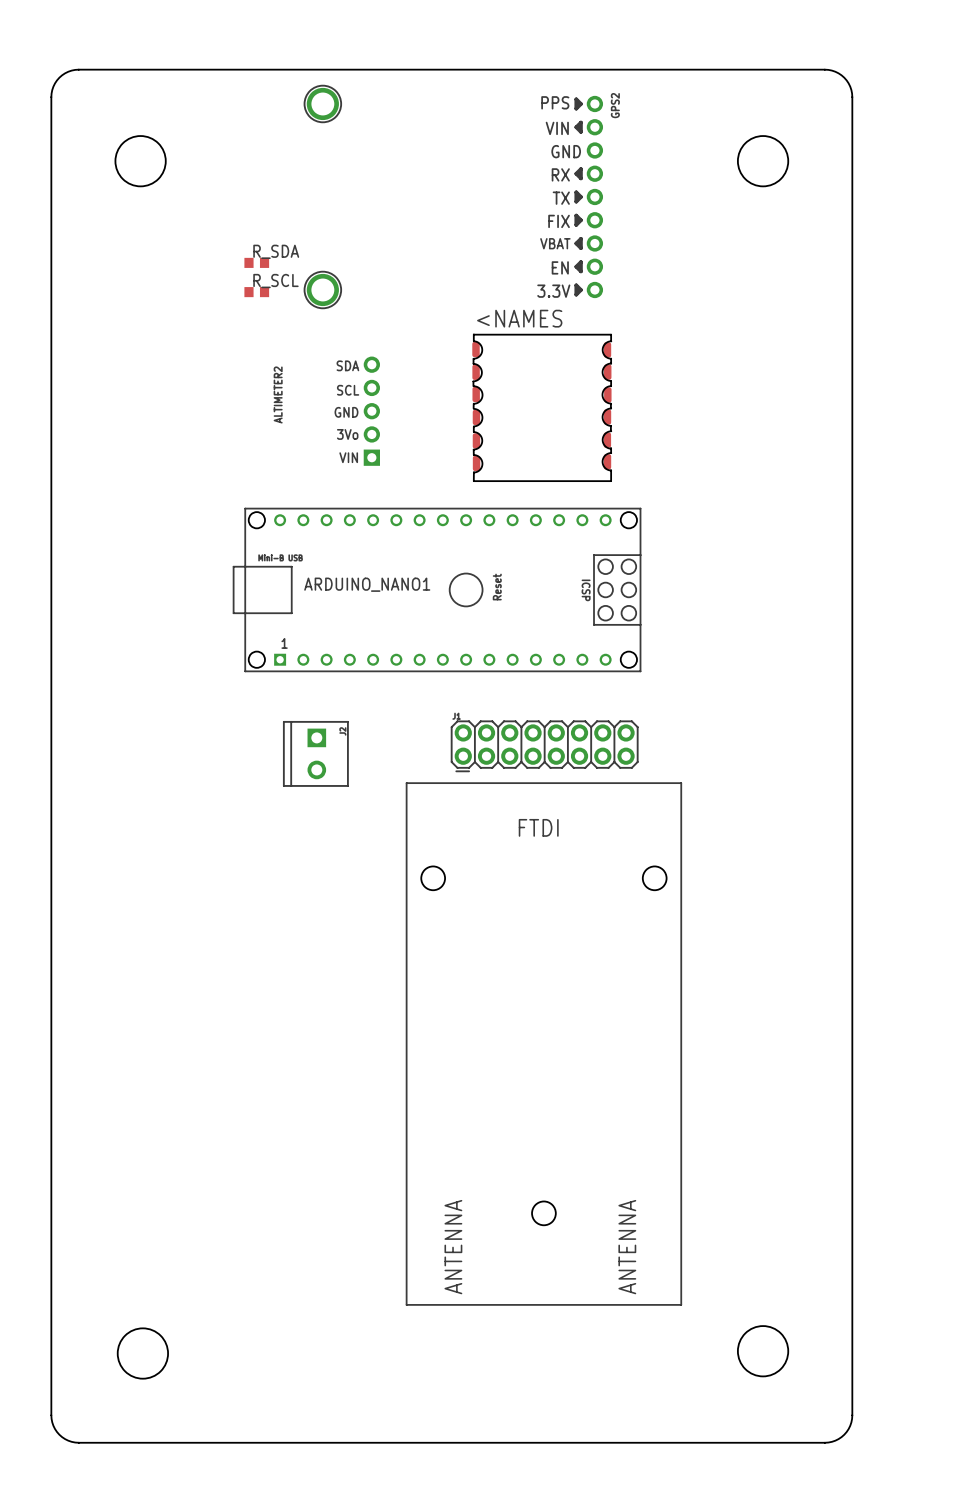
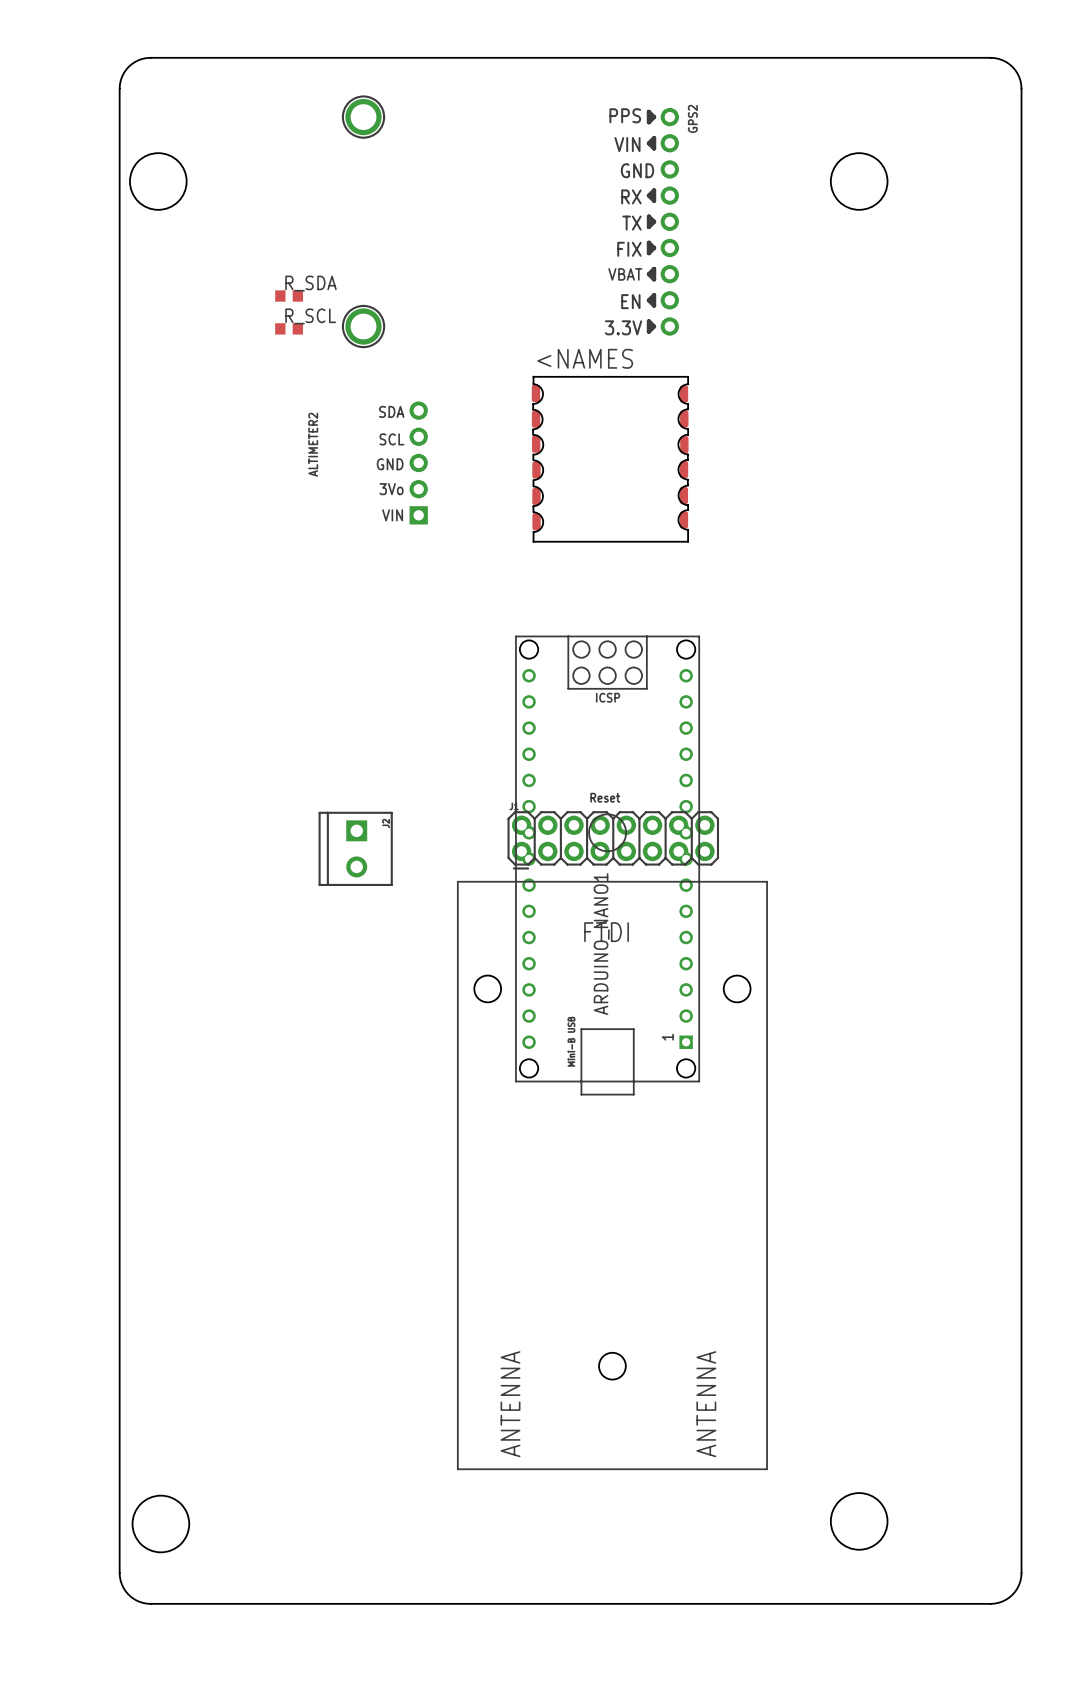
board edge: (78, 69) (824, 69) (838, 73) (848, 83) (852, 97) (852, 1415) (848, 1429) (838, 1439) (824, 1442) (78, 1442) (65, 1439) (55, 1429) (51, 1415) (51, 97) (53, 86) (59, 77) (68, 71) (78, 69) -> (150, 57) (990, 57) (1006, 61) (1017, 73) (1021, 88) (1021, 1572) (1017, 1588) (1006, 1599) (990, 1603) (150, 1603) (135, 1599) (123, 1588) (119, 1572) (119, 88) (122, 76) (128, 66) (138, 60) (150, 57)
ARDUINO_NANO1 footprint: [233, 508, 642, 672] -> [515, 635, 700, 1096]
ARDUINO_NANO1 name position: ARDUINO_NANO1 (367, 584) -> ARDUINO_NANO1 (601, 944)

